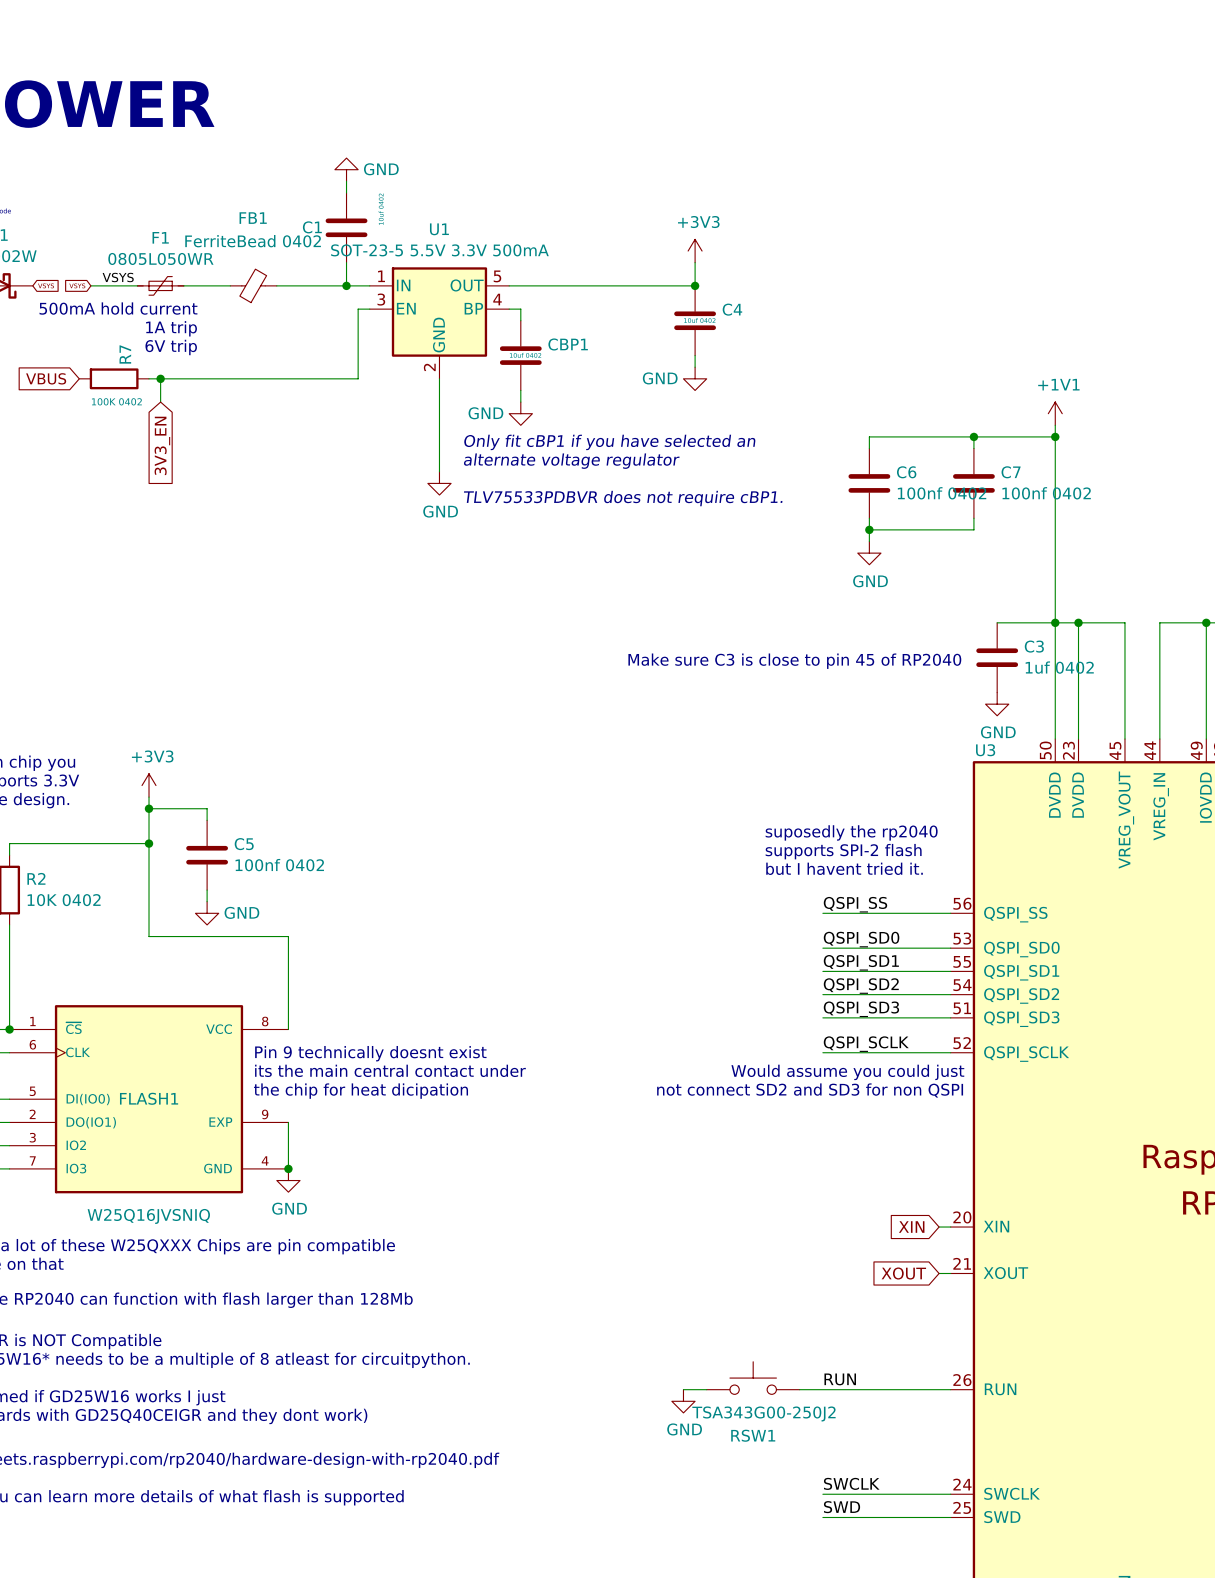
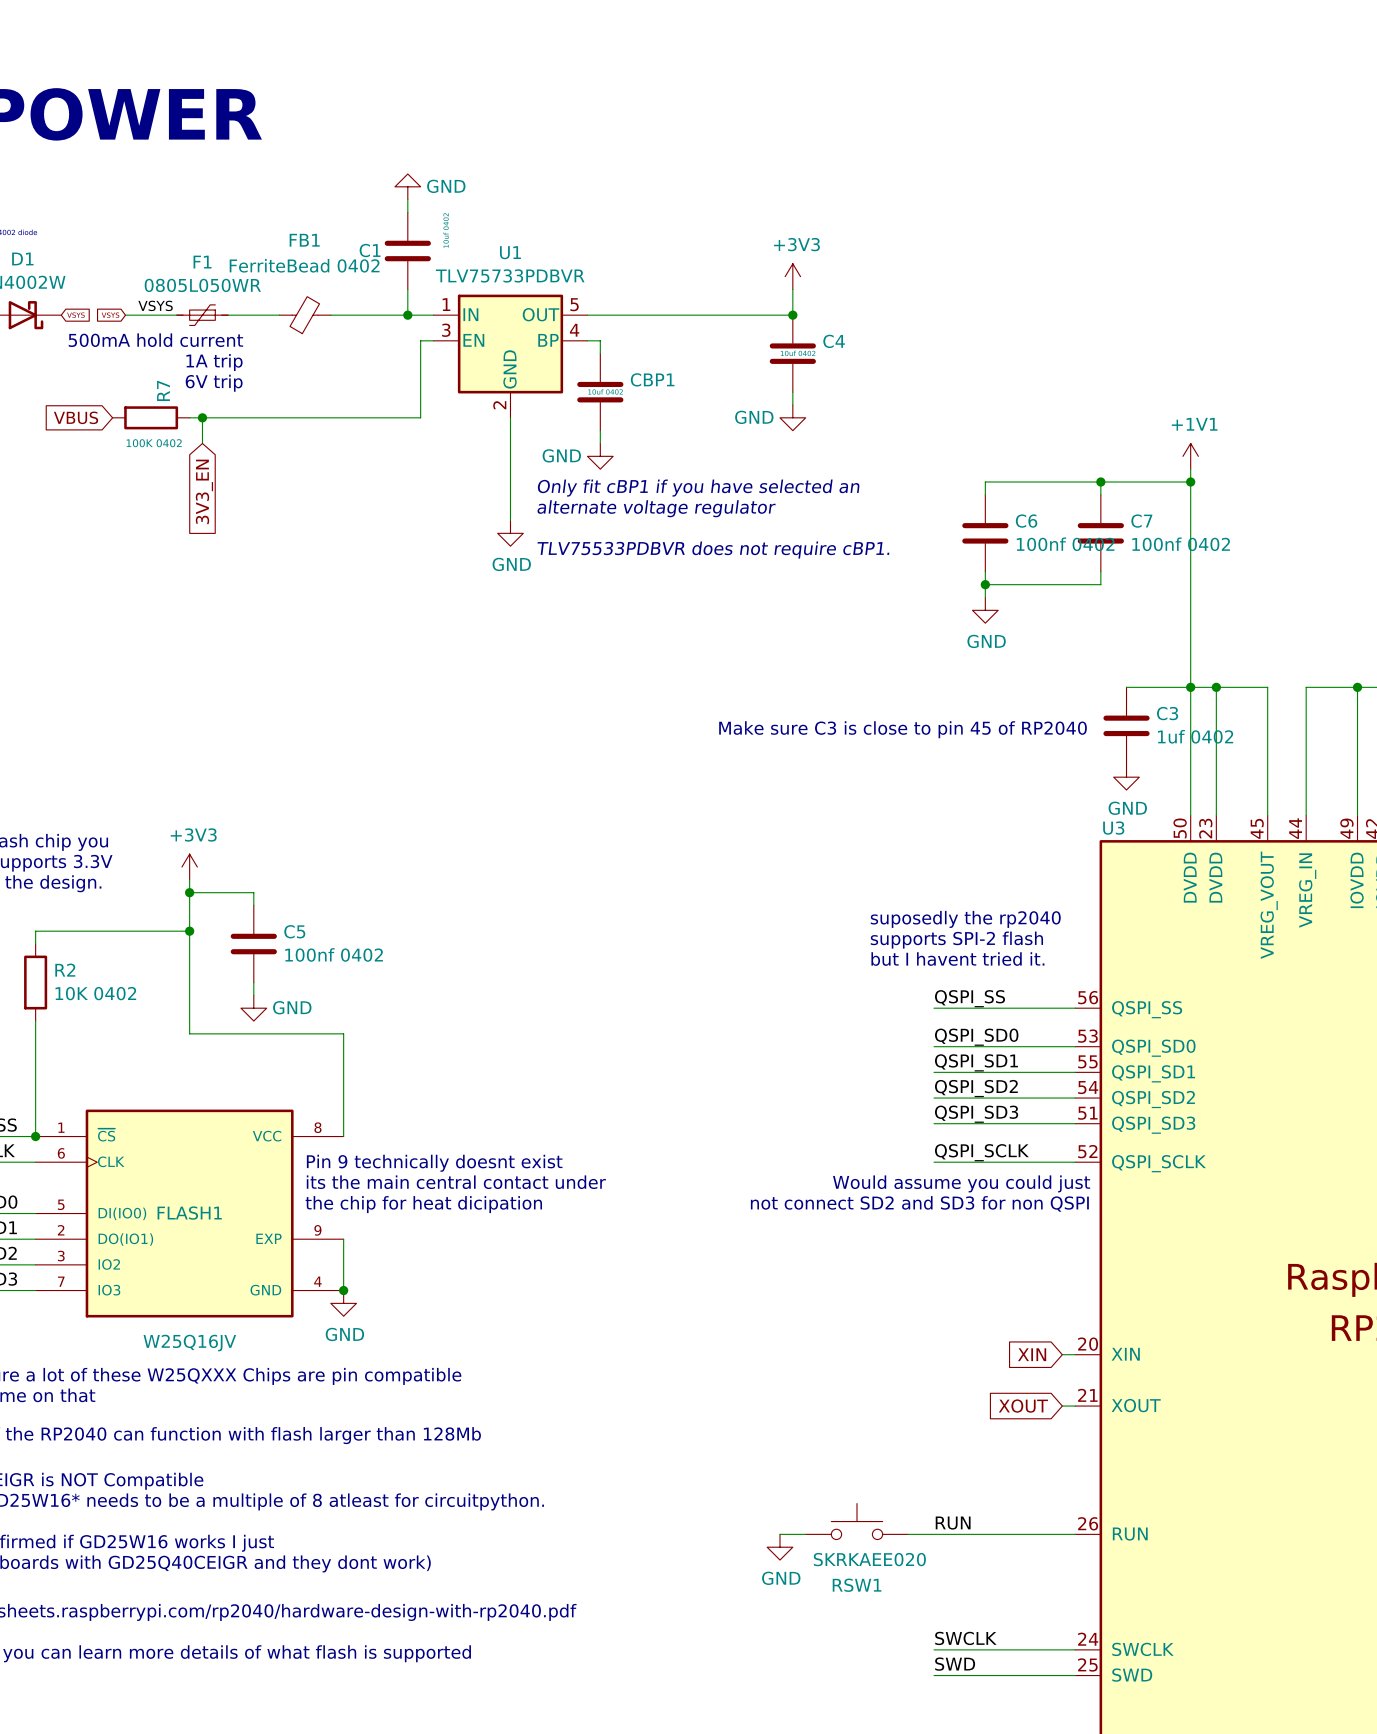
U1 value: SOT-23-5 5.5V 3.3V 500mA (439, 250) -> TLV75733PDBVR (510, 275)
FLASH1 value: W25Q16JVSNIQ (148, 1216) -> W25Q16JV (189, 1343)
RSW1 value: TSA343G00-250J2 (763, 1413) -> SKRKAEE020 (869, 1559)

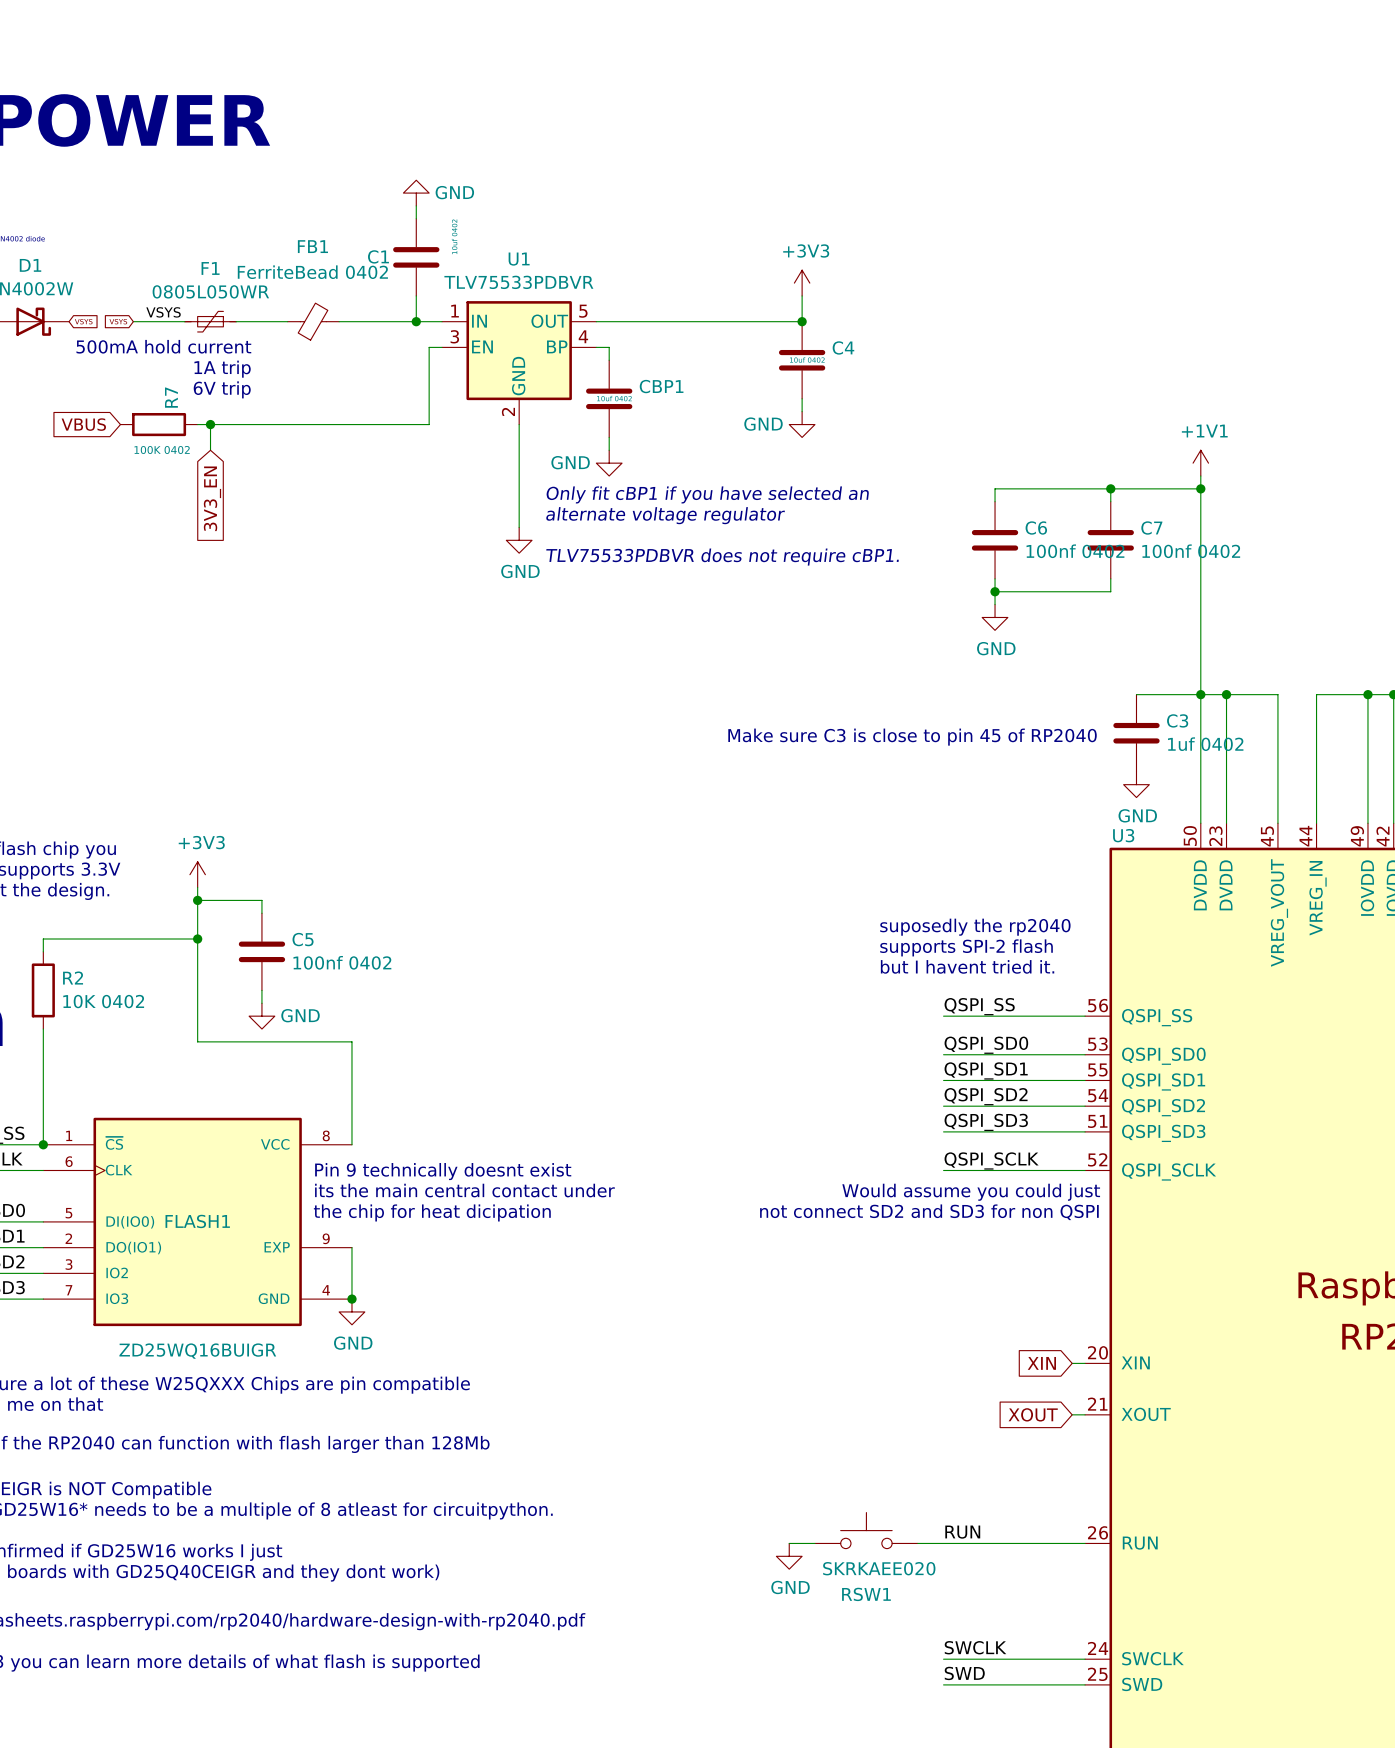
U1 value: TLV75733PDBVR (510, 275) -> TLV75533PDBVR (518, 282)
FLASH1 value: W25Q16JV (189, 1343) -> ZD25WQ16BUIGR (197, 1351)

